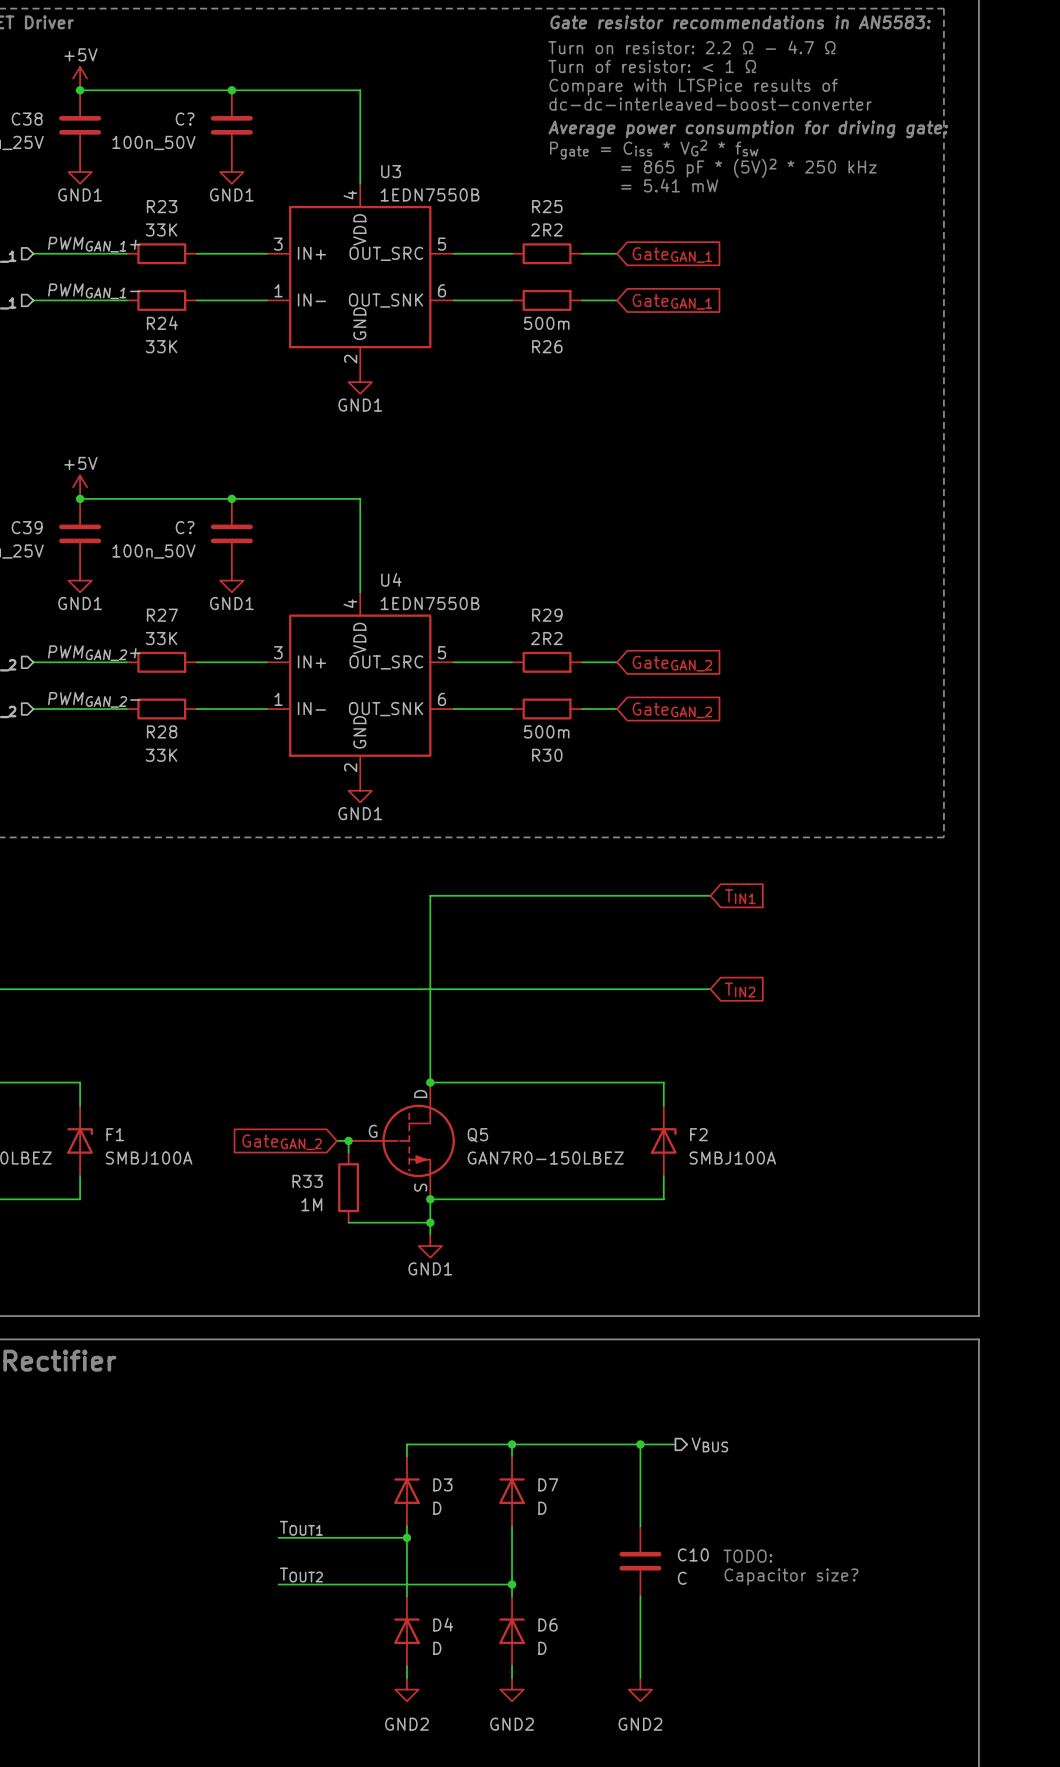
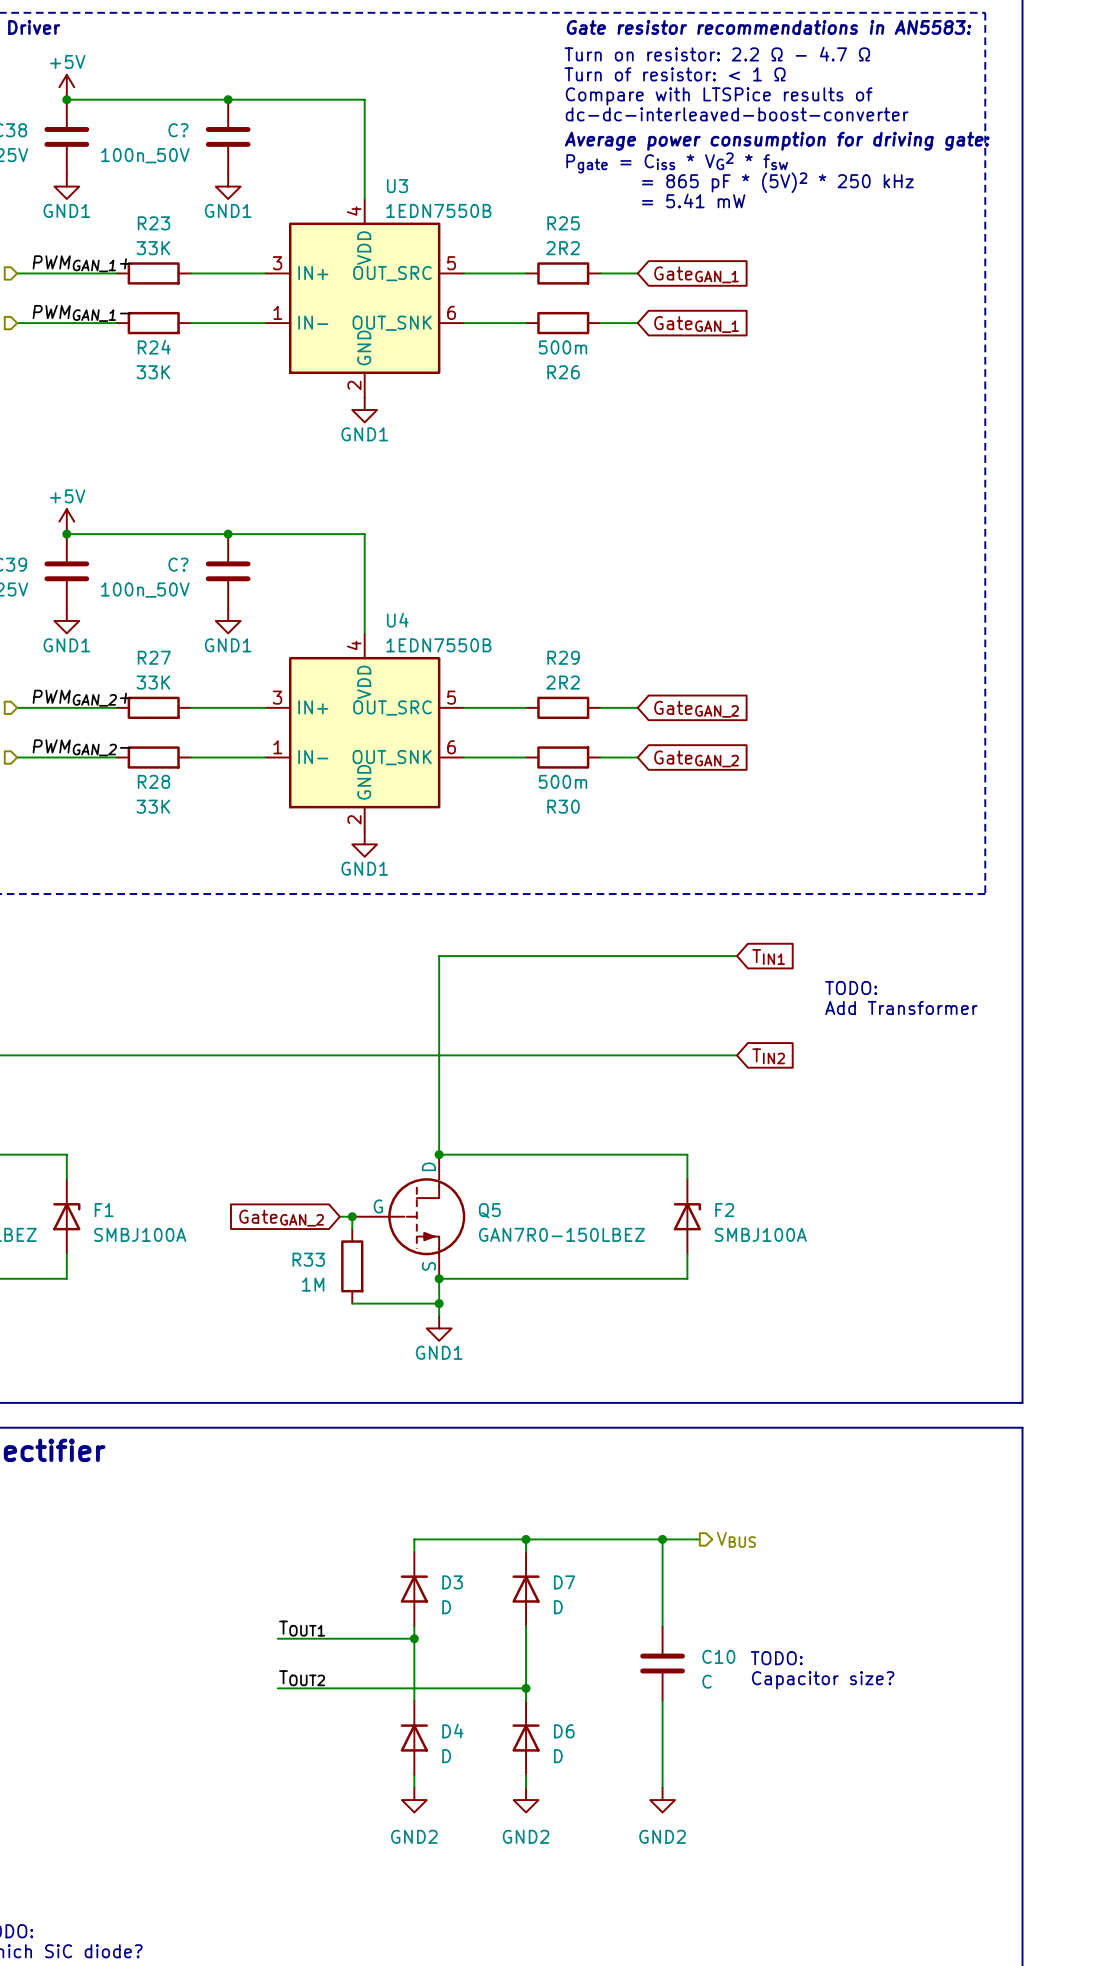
text: none -> TODO: (851, 987)
text: none -> Add Transformer (901, 1007)

